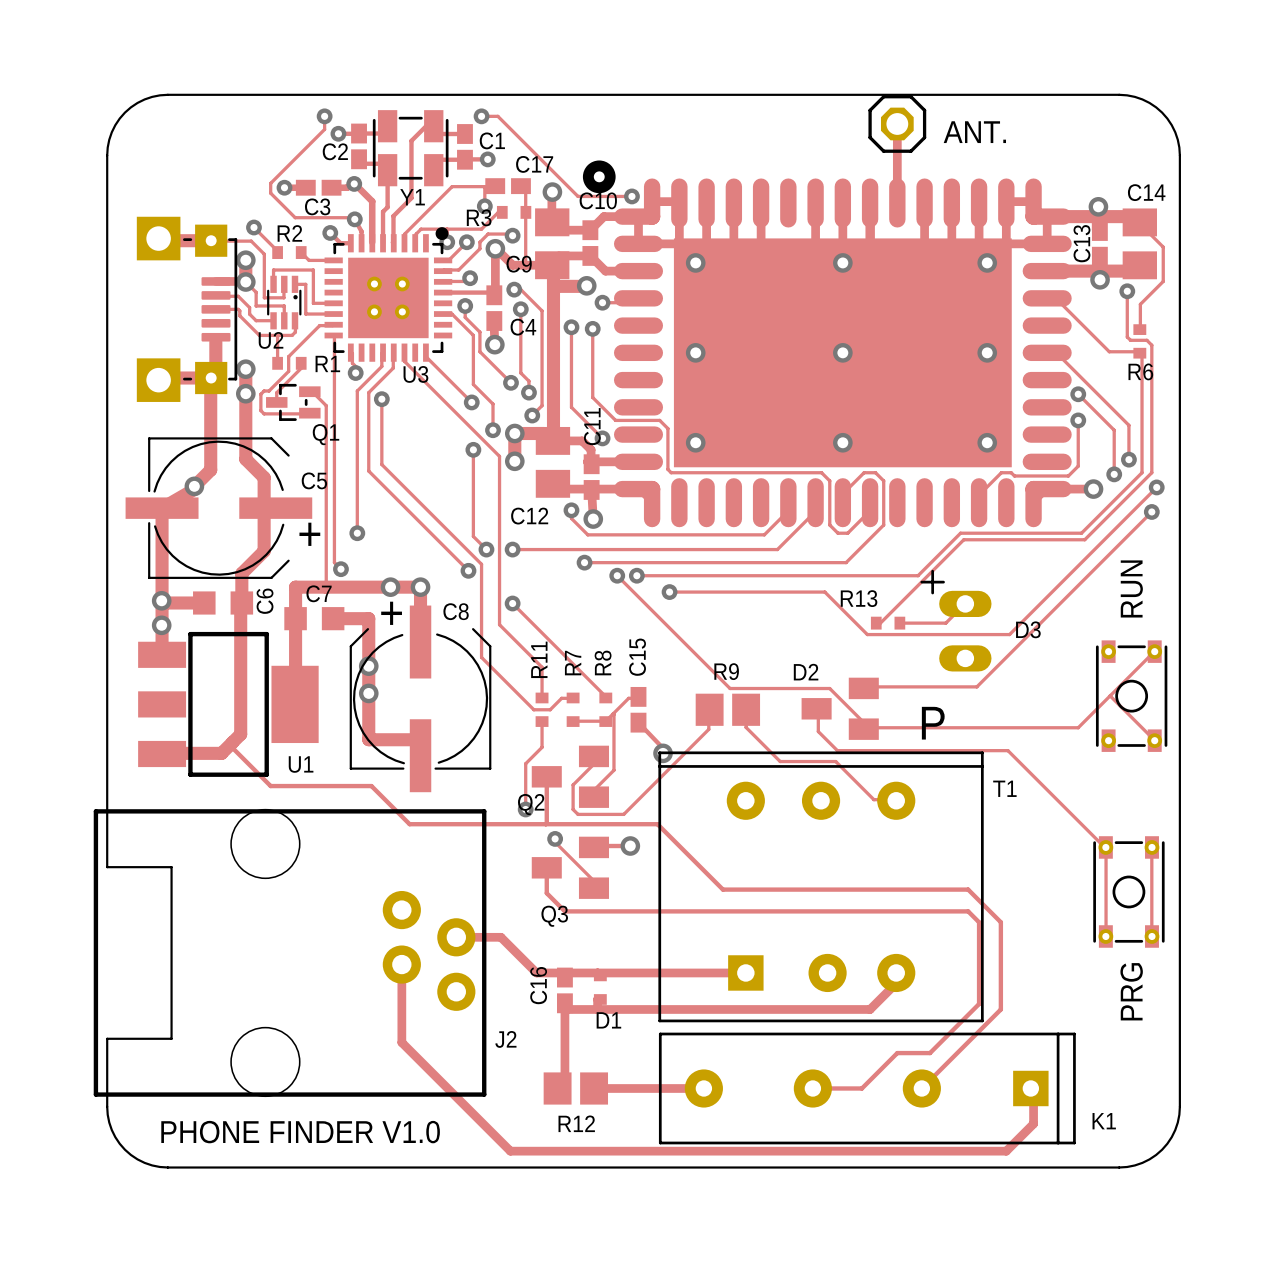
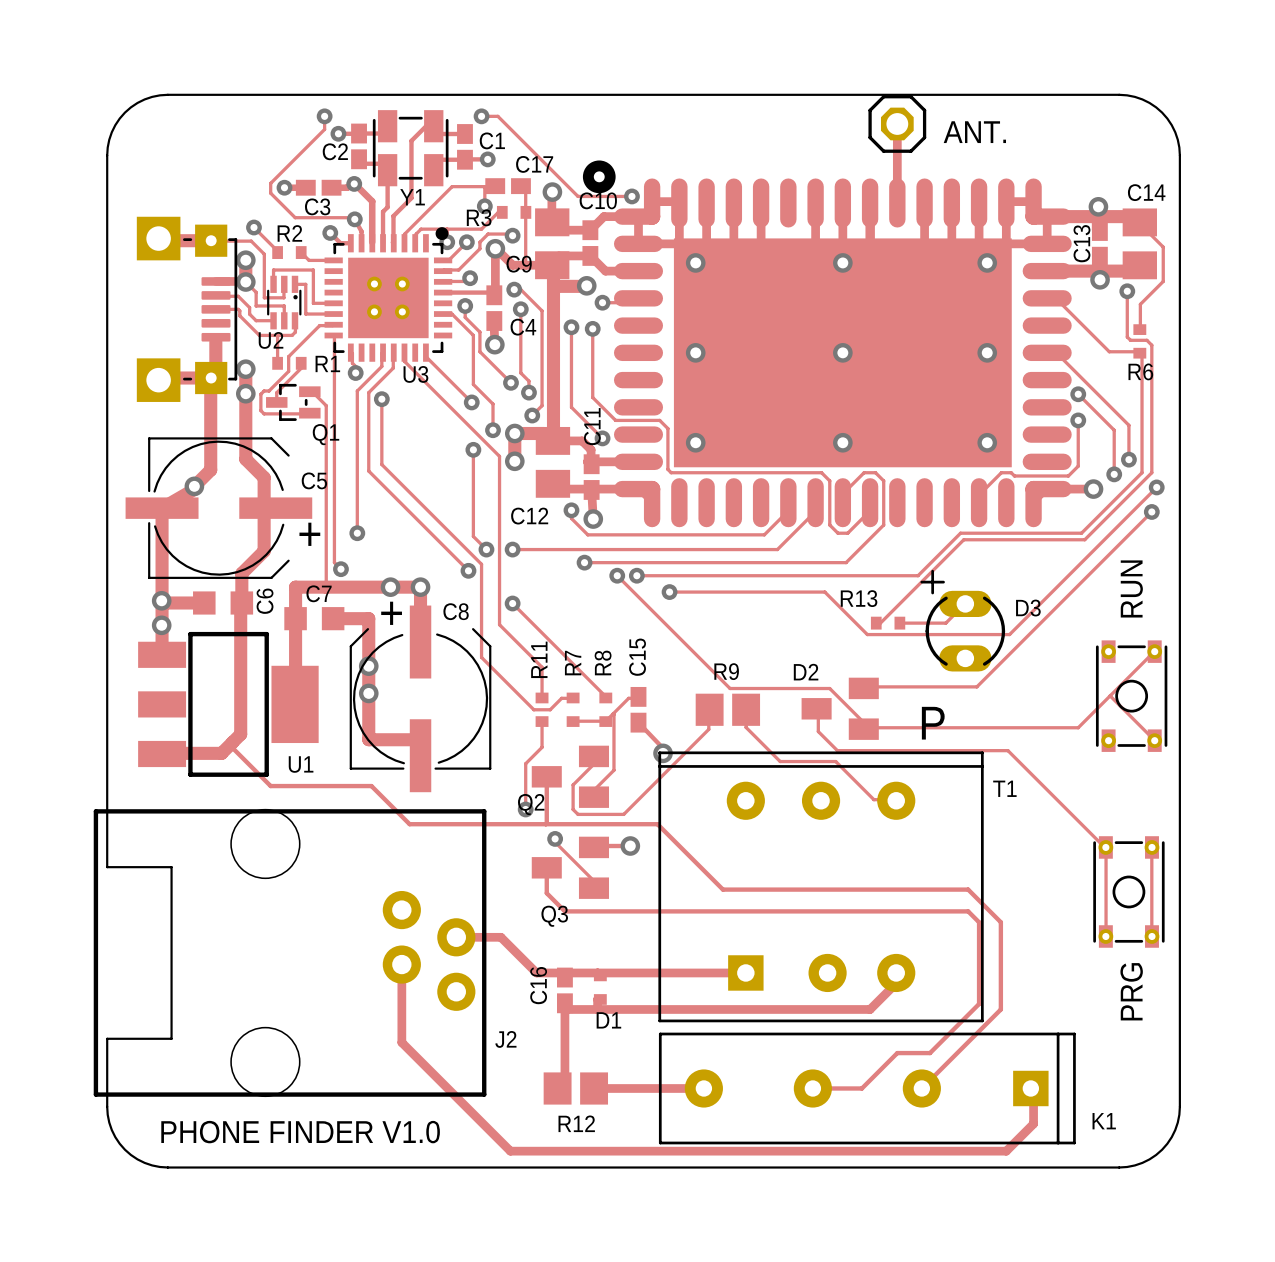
D3 footprint: [920, 569, 992, 672] -> [920, 569, 1006, 672]

